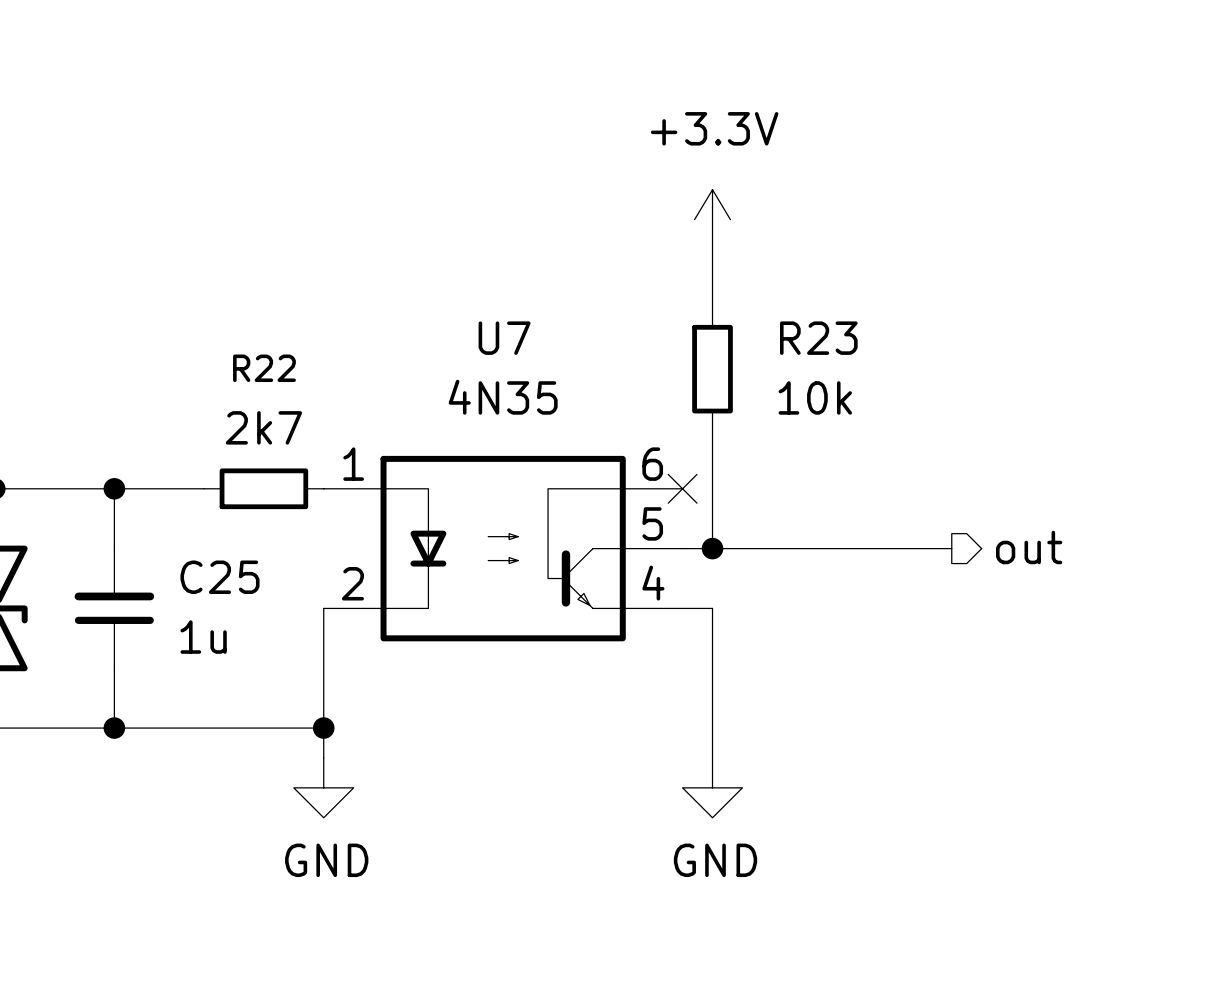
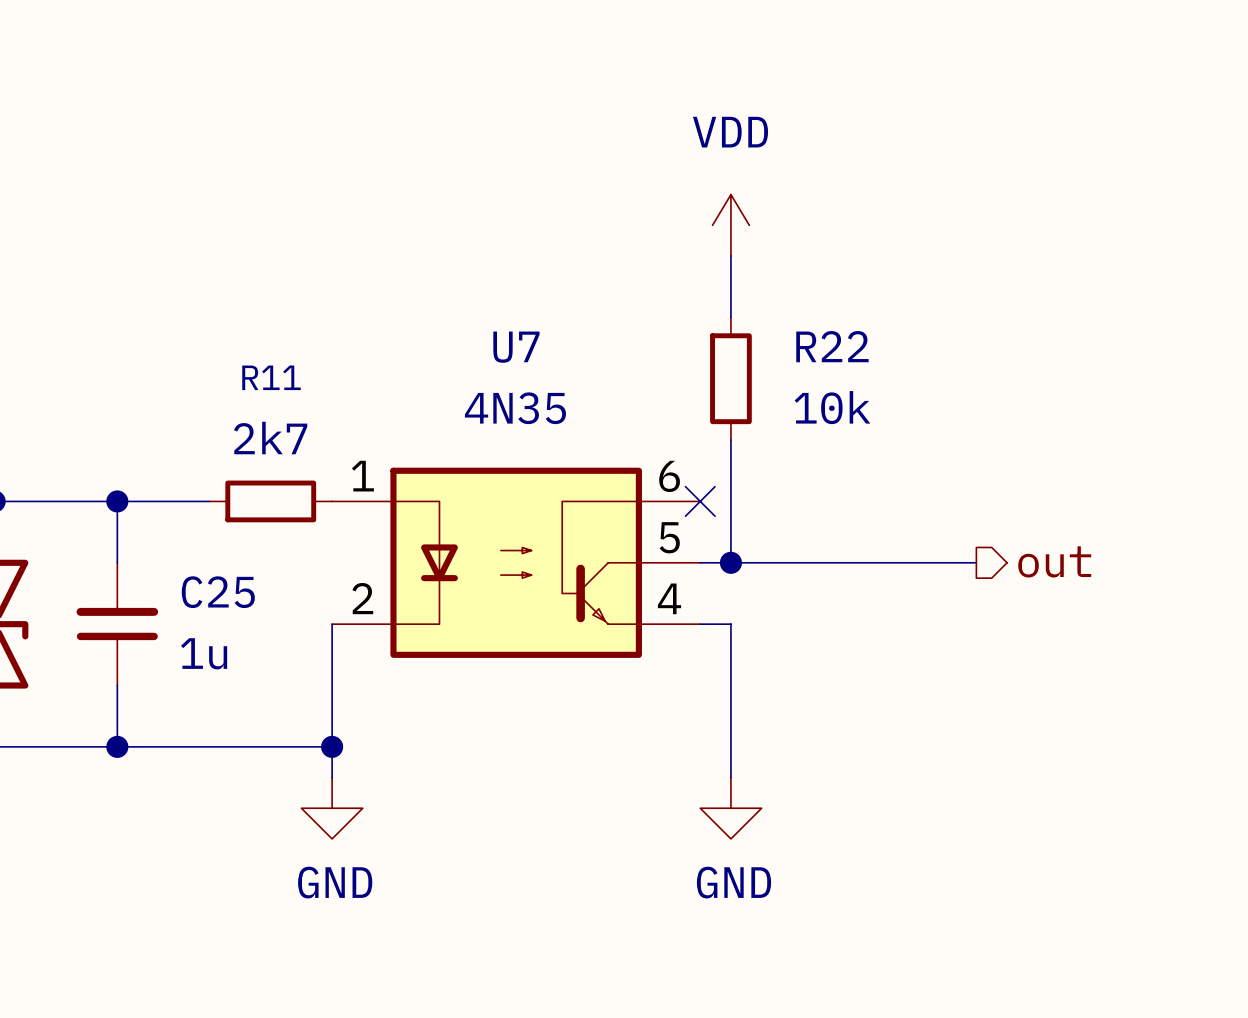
power symbol: +3.3V (712, 219) -> VDD (730, 225)
R23 name: R23 (818, 338) -> R22 (832, 346)
R22 name: R22 (264, 368) -> R11 (271, 377)

